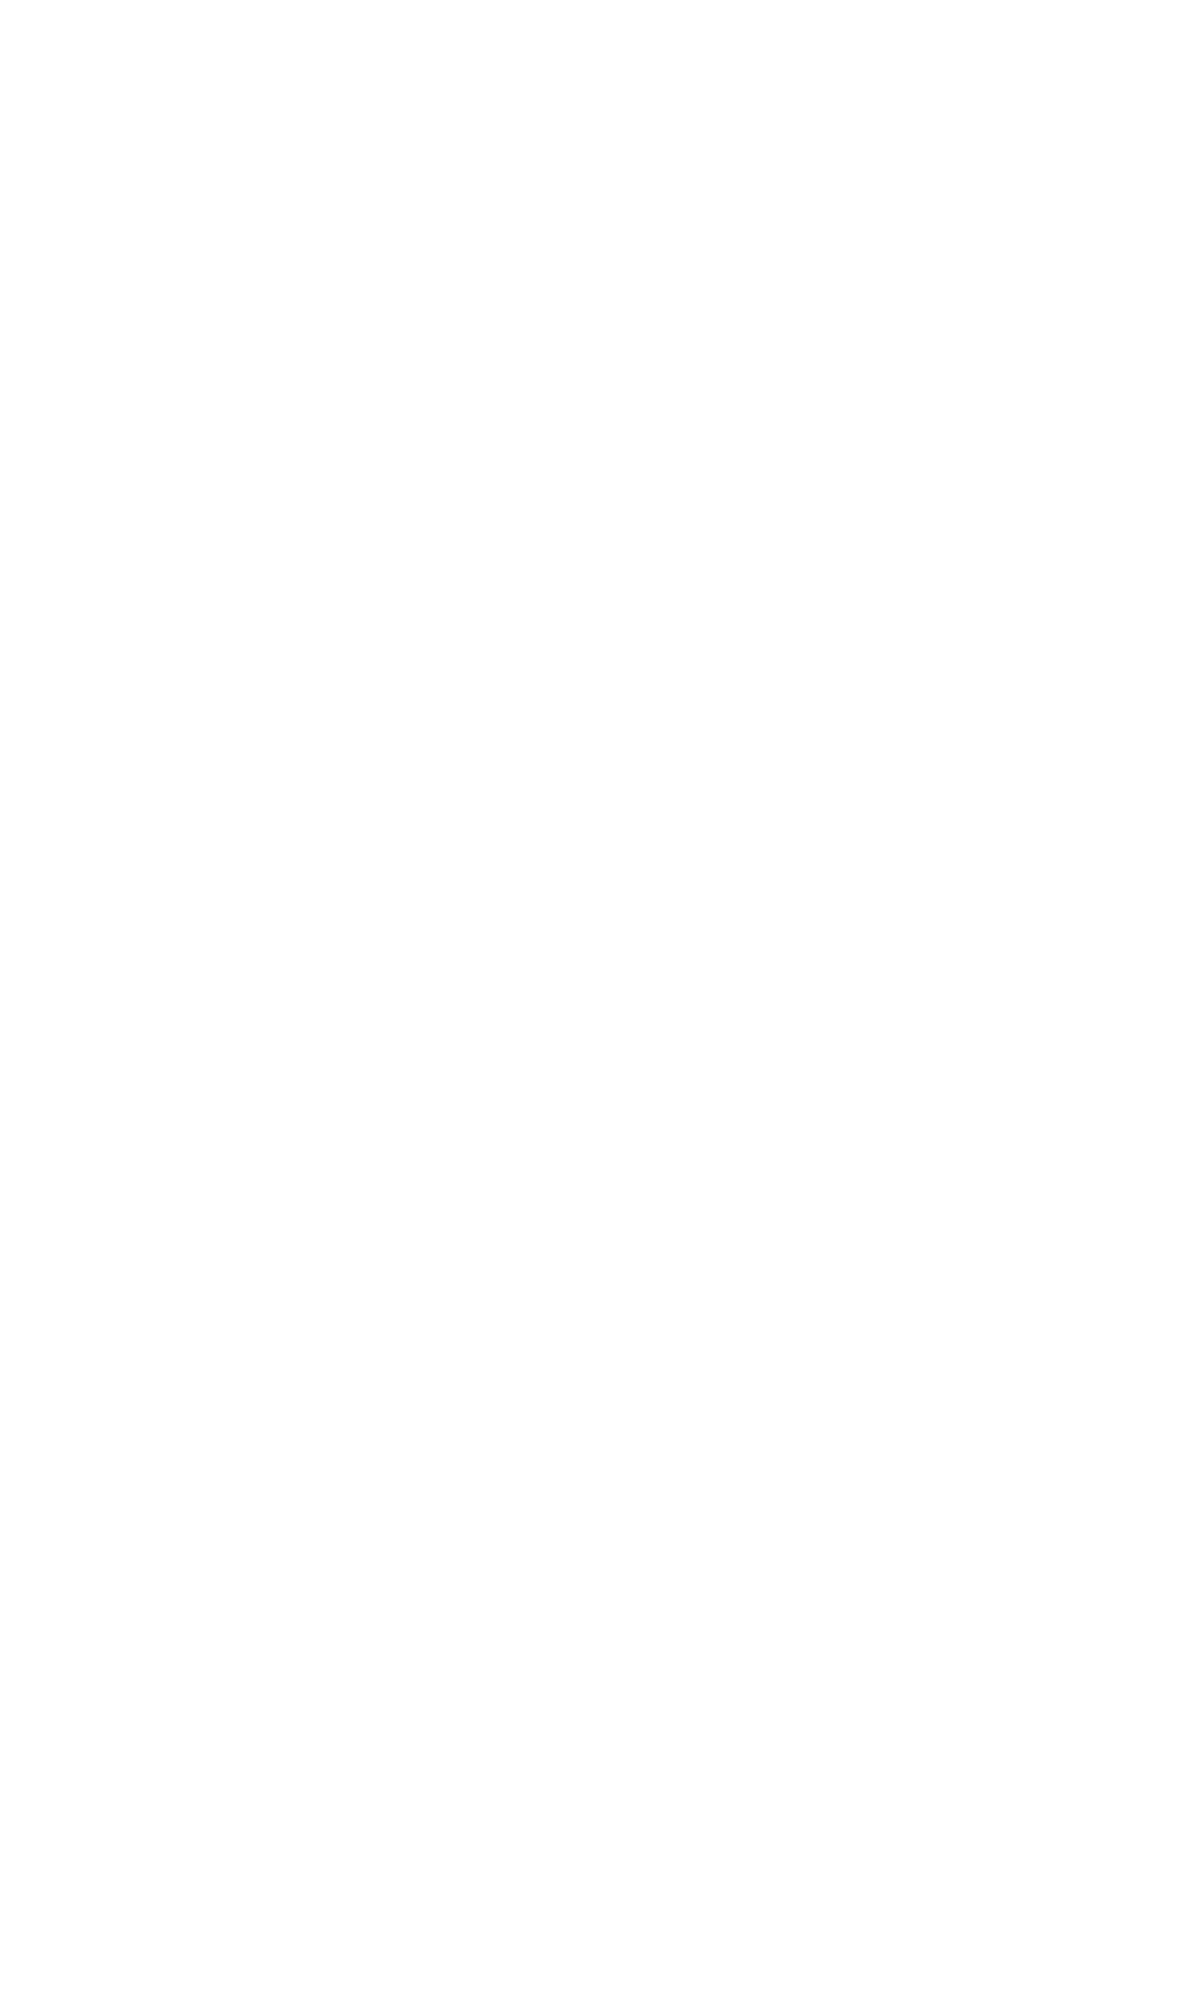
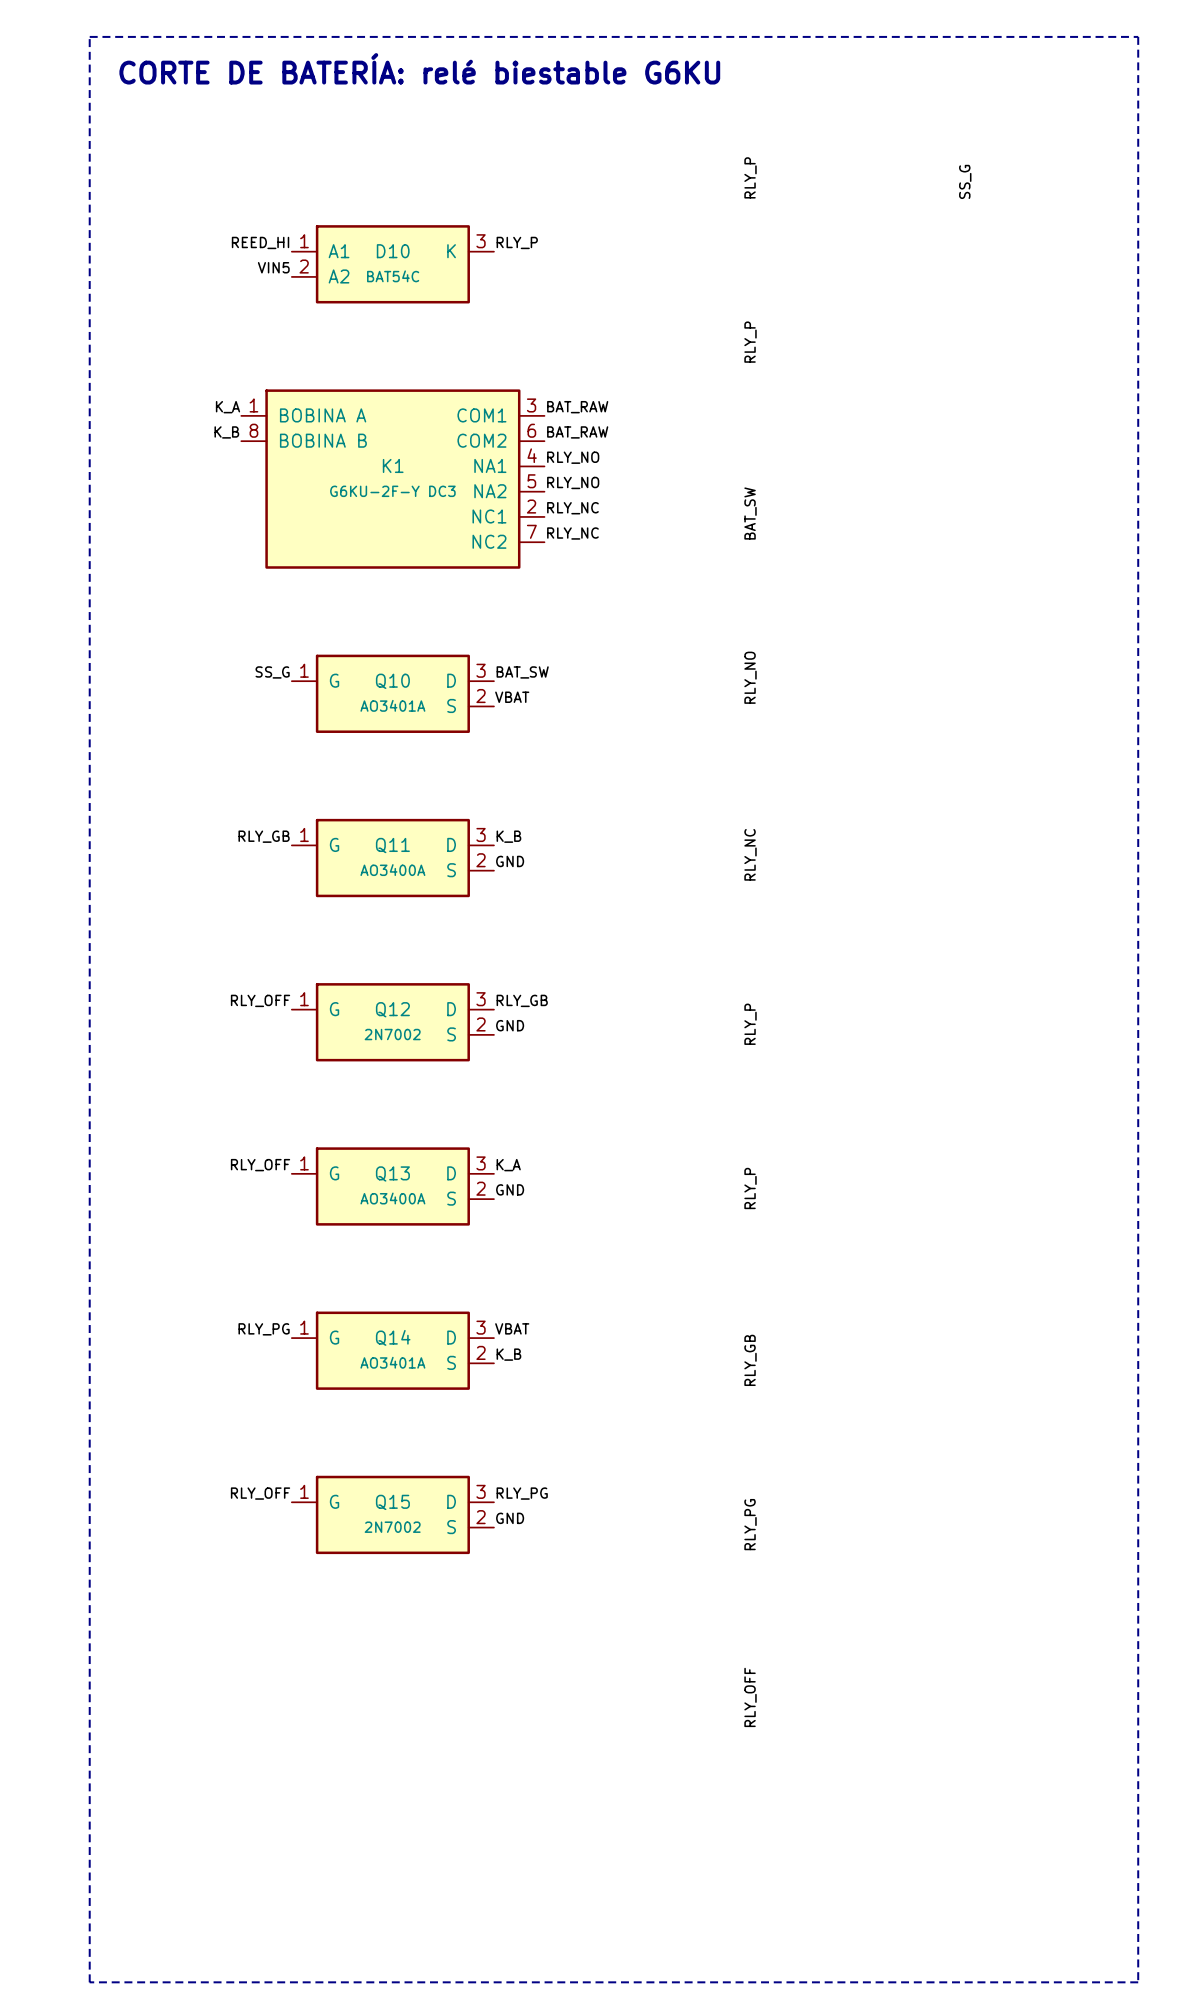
line: none -> (89, 36) (1138, 36) (1138, 1982) (89, 1982) (89, 36)
text: none -> CORTE DE BATERÍA: relé biestable G6KU (419, 68)
label: none -> RLY_P (750, 177)
label: none -> SS_G (965, 181)
label: none -> REED_HI (260, 242)
label: none -> RLY_P (517, 242)
D10: none -> BAT54C (392, 264)
label: none -> VIN5 (273, 267)
label: none -> RLY_P (750, 342)
label: none -> K_A (228, 407)
label: none -> BAT_RAW (577, 407)
label: none -> K_B (226, 432)
label: none -> BAT_RAW (577, 432)
label: none -> RLY_NO (573, 457)
K1: none -> G6KU-2F-Y DC3 (392, 479)
label: none -> RLY_NO (573, 482)
label: none -> RLY_NC (572, 508)
label: none -> BAT_SW (750, 513)
label: none -> RLY_NC (572, 533)
label: none -> SS_G (272, 672)
label: none -> BAT_SW (522, 672)
label: none -> RLY_NO (750, 677)
Q10: none -> AO3401A (392, 693)
label: none -> VBAT (512, 697)
label: none -> RLY_GB (264, 836)
label: none -> K_B (508, 836)
label: none -> RLY_NC (750, 854)
Q11: none -> AO3400A (392, 858)
label: none -> GND (510, 861)
label: none -> RLY_OFF (260, 1000)
label: none -> RLY_GB (522, 1000)
Q12: none -> 2N7002 (392, 1022)
label: none -> RLY_P (750, 1024)
label: none -> GND (510, 1025)
label: none -> RLY_OFF (260, 1165)
label: none -> K_A (508, 1165)
Q13: none -> AO3400A (392, 1186)
label: none -> RLY_P (750, 1188)
label: none -> GND (510, 1189)
label: none -> VBAT (512, 1328)
label: none -> RLY_PG (264, 1329)
Q14: none -> AO3401A (392, 1350)
label: none -> K_B (508, 1354)
label: none -> RLY_GB (750, 1360)
label: none -> RLY_OFF (260, 1493)
label: none -> RLY_PG (522, 1493)
Q15: none -> 2N7002 (392, 1514)
label: none -> GND (510, 1518)
label: none -> RLY_PG (750, 1524)
label: none -> RLY_OFF (750, 1697)

